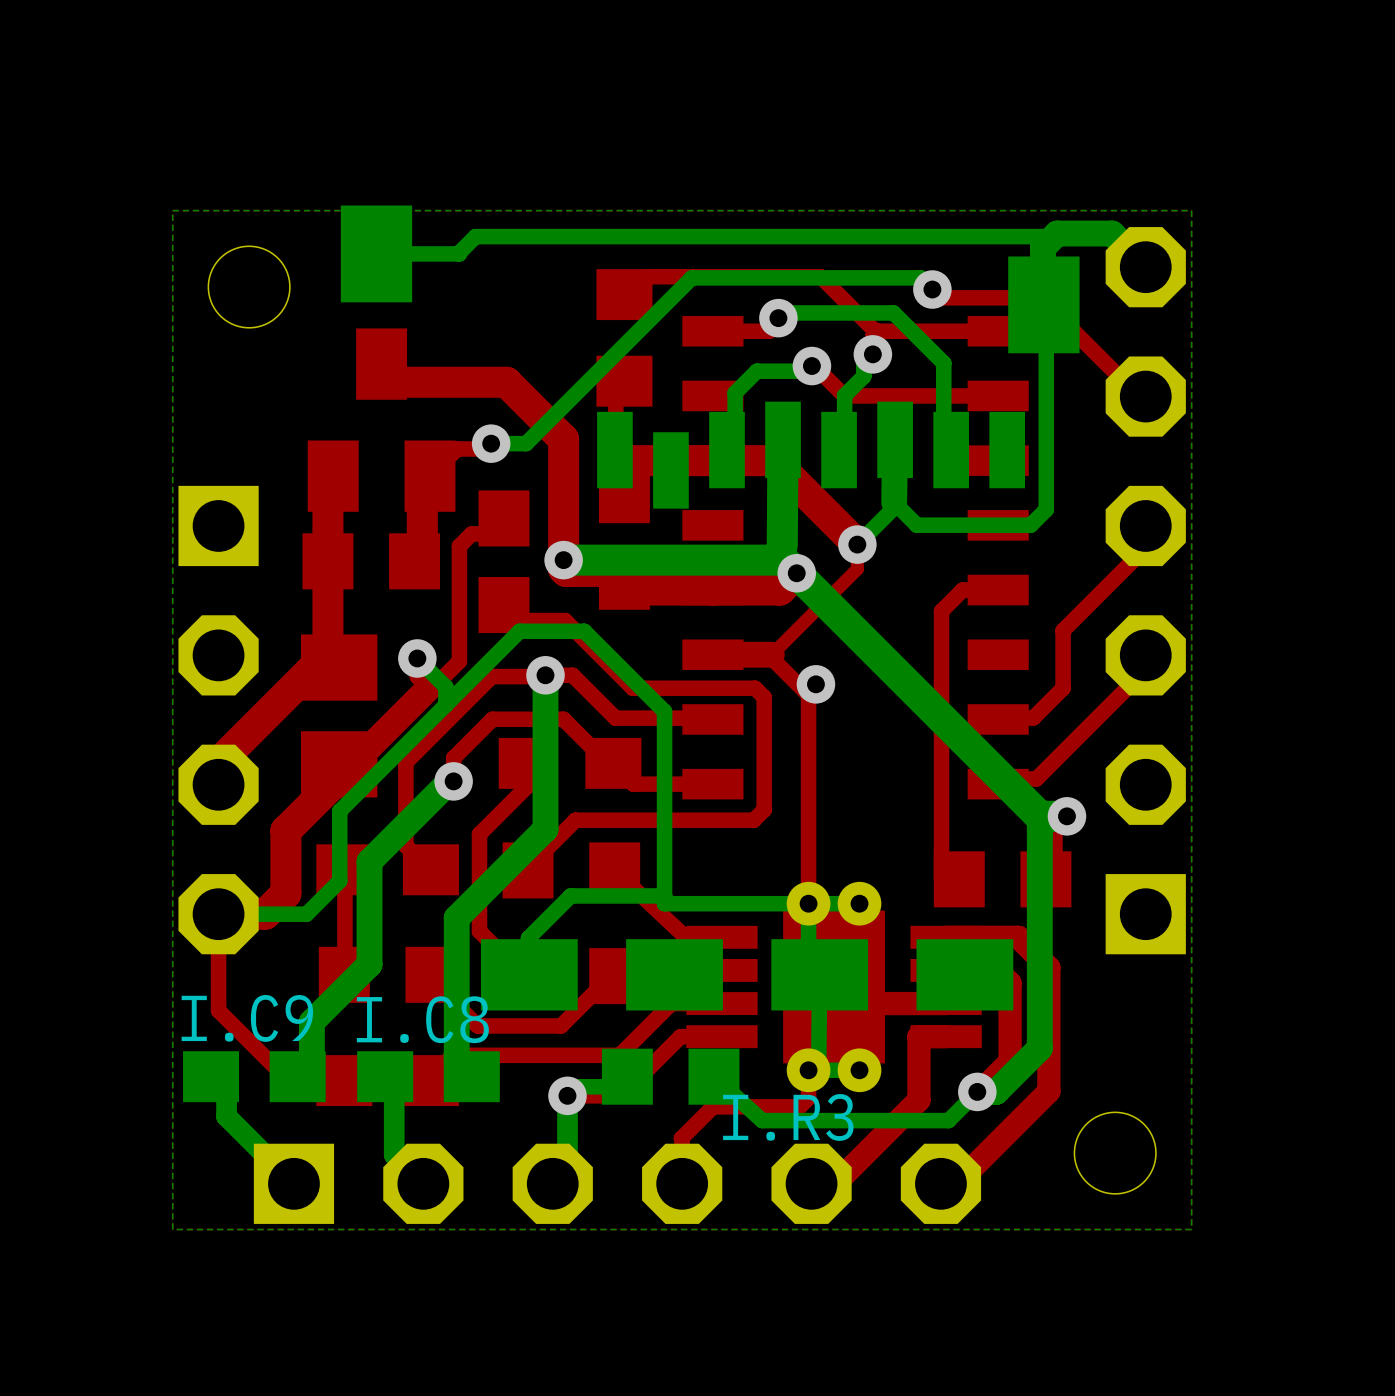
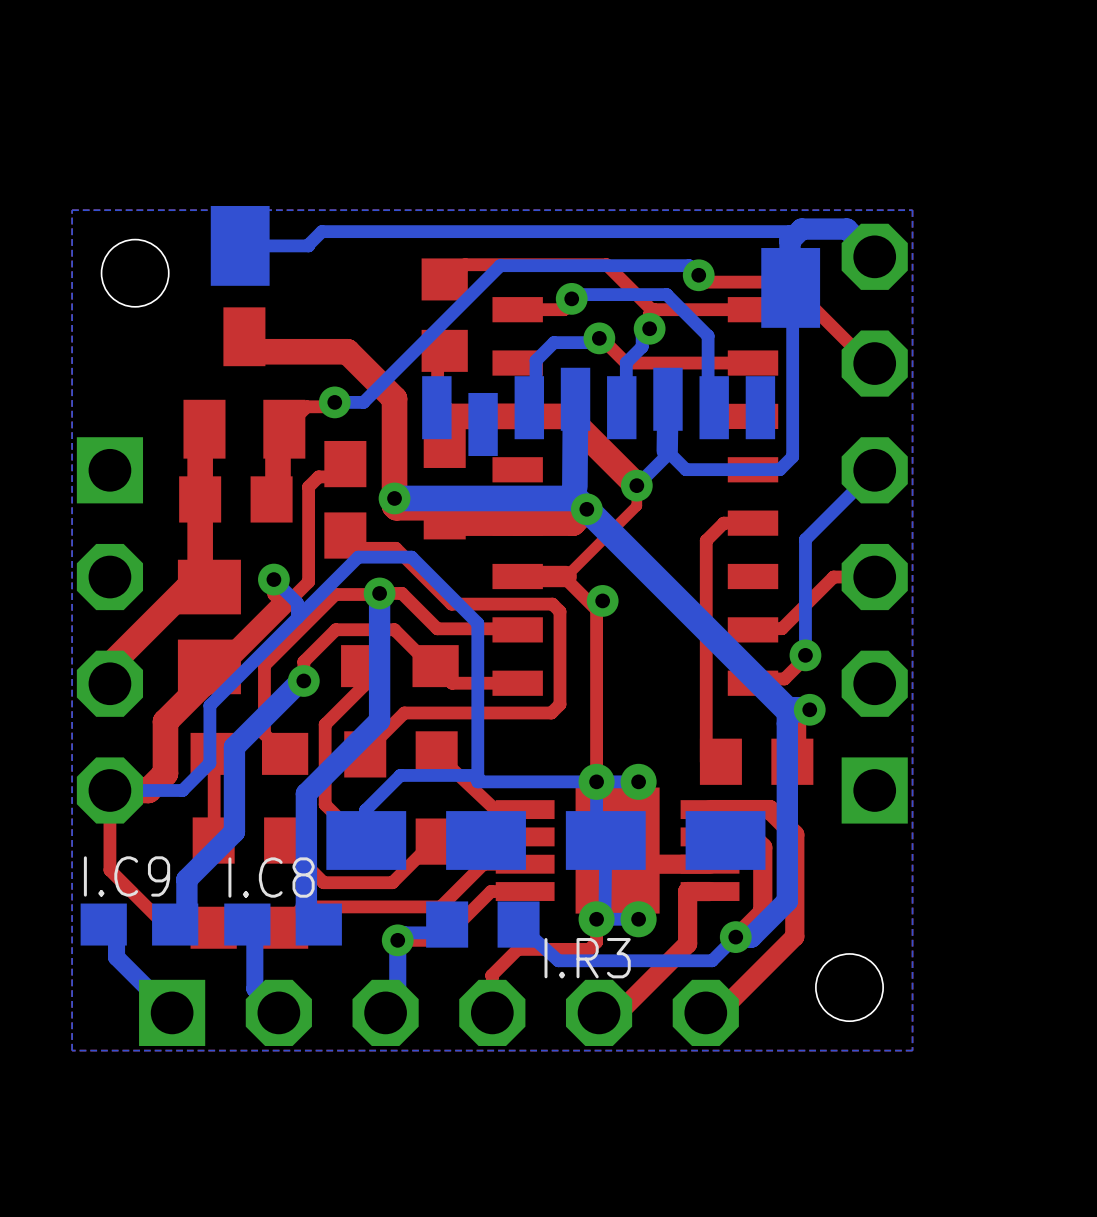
top track: (1145, 525) (1145, 547) (1063, 630) (1063, 688) -> none
bottom track: none -> (874, 470) (805, 539) (805, 655)
top track: (1145, 655) (1145, 669) (1061, 753) -> (874, 577) (833, 577) (806, 604)
via: none -> (805, 655)

